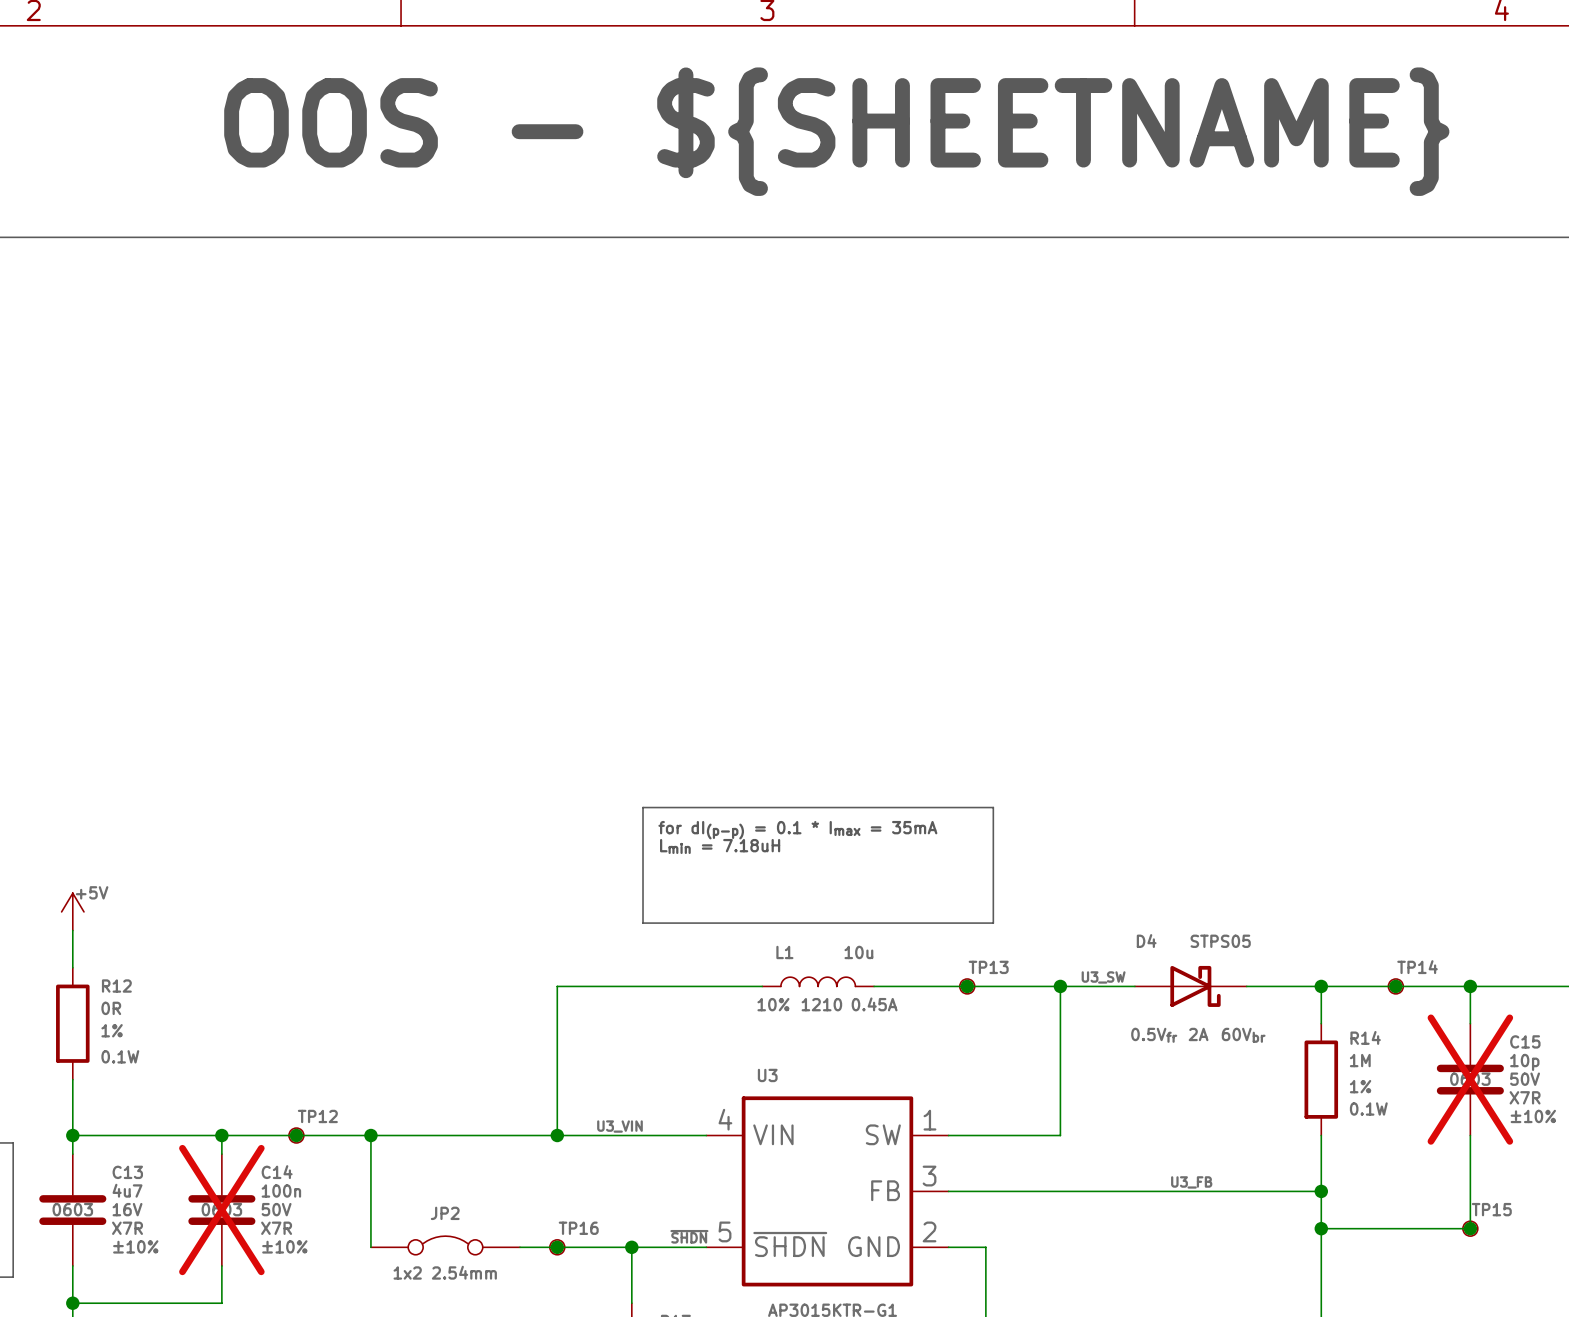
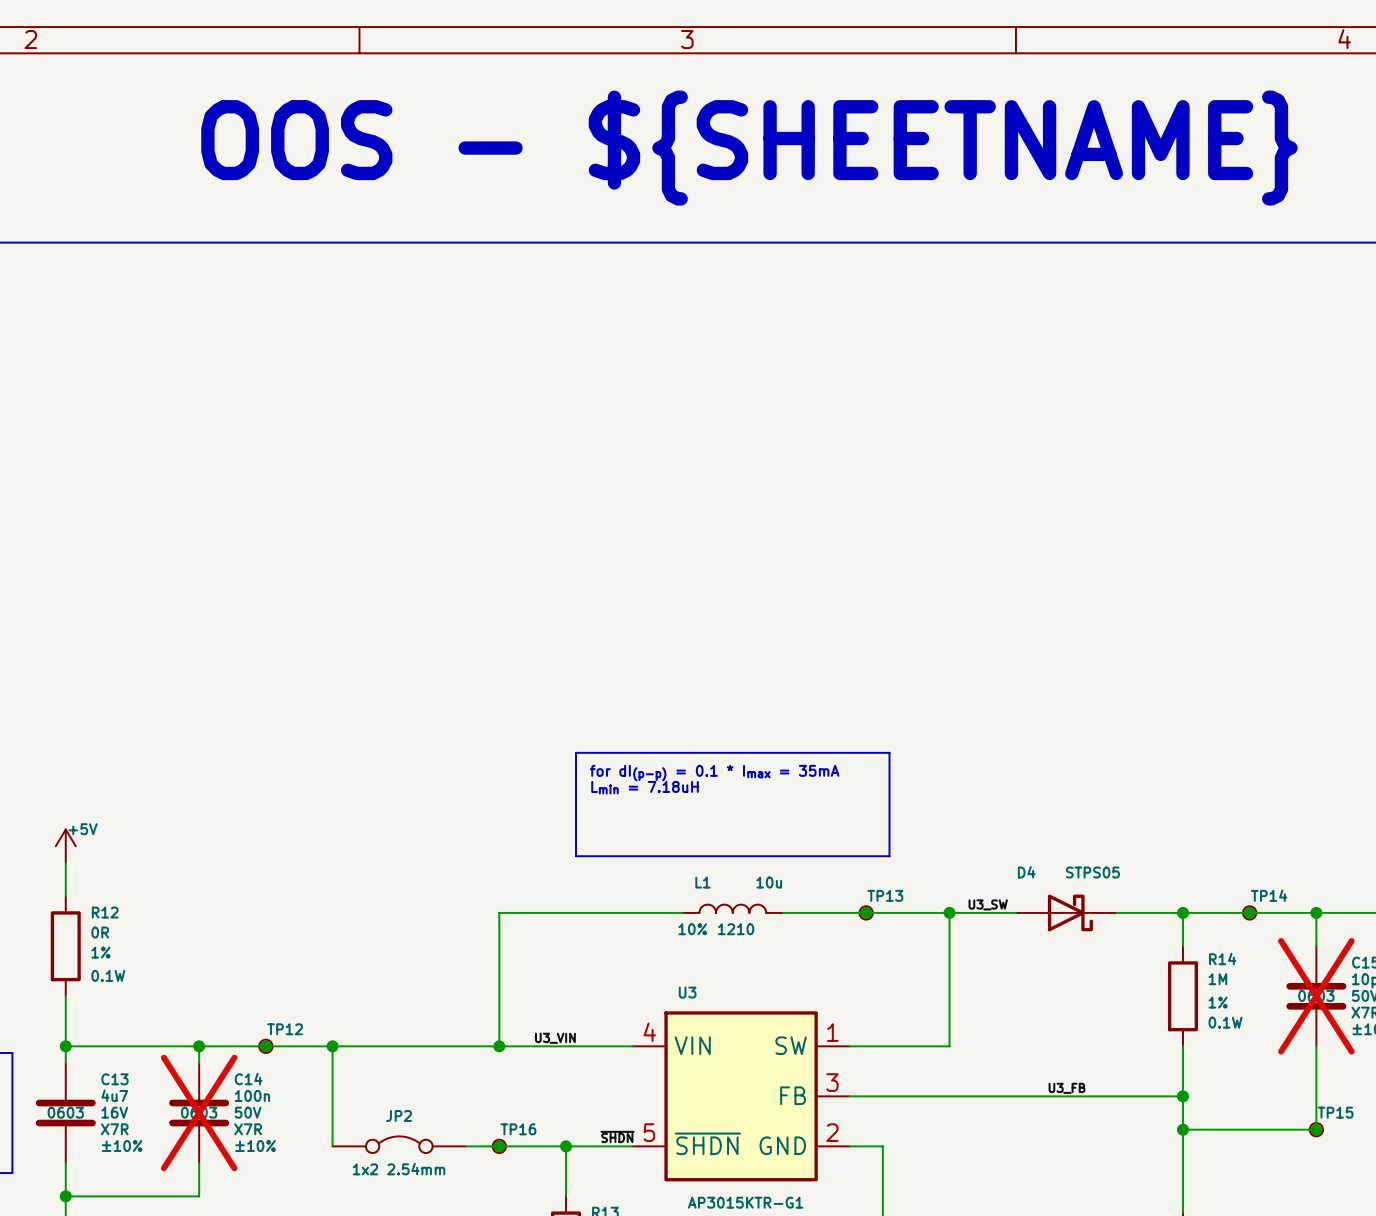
L1 text: 0.45A (874, 1004) -> none
D4 text: 2A (1198, 1034) -> none
D4 text: 0.5Vfr (1154, 1035) -> none
D4 text: 60Vbr (1243, 1035) -> none

